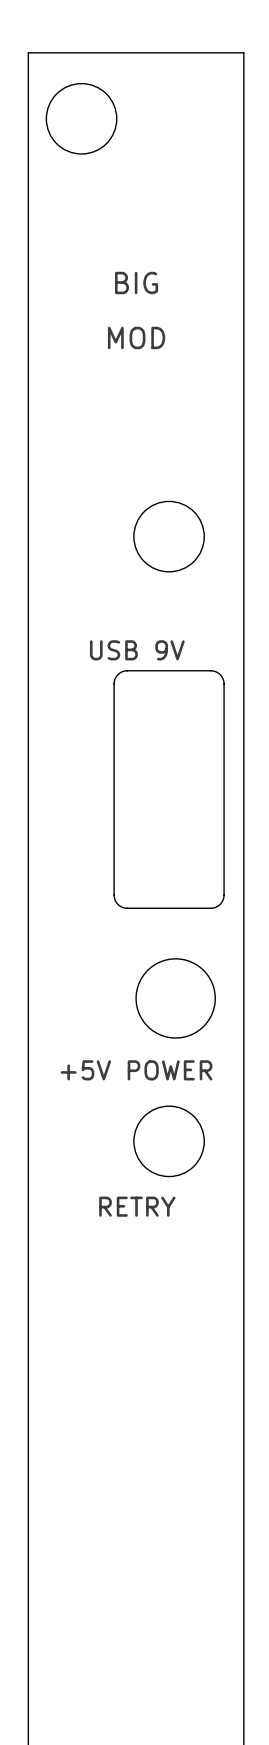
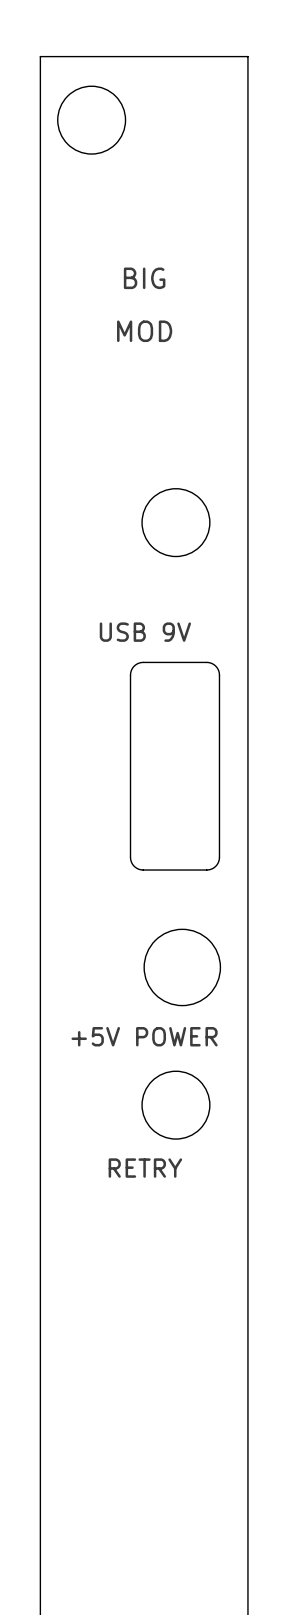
board edge: (127, 670) (212, 670) (219, 673) (223, 679) (224, 895) (221, 903) (215, 907) (125, 908) (119, 905) (114, 899) (114, 683) (117, 674) (127, 670) -> (143, 662) (135, 665) (130, 673) (131, 861) (135, 867) (141, 869) (210, 869) (216, 865) (219, 857) (218, 670) (214, 665) (208, 662) (143, 662)

